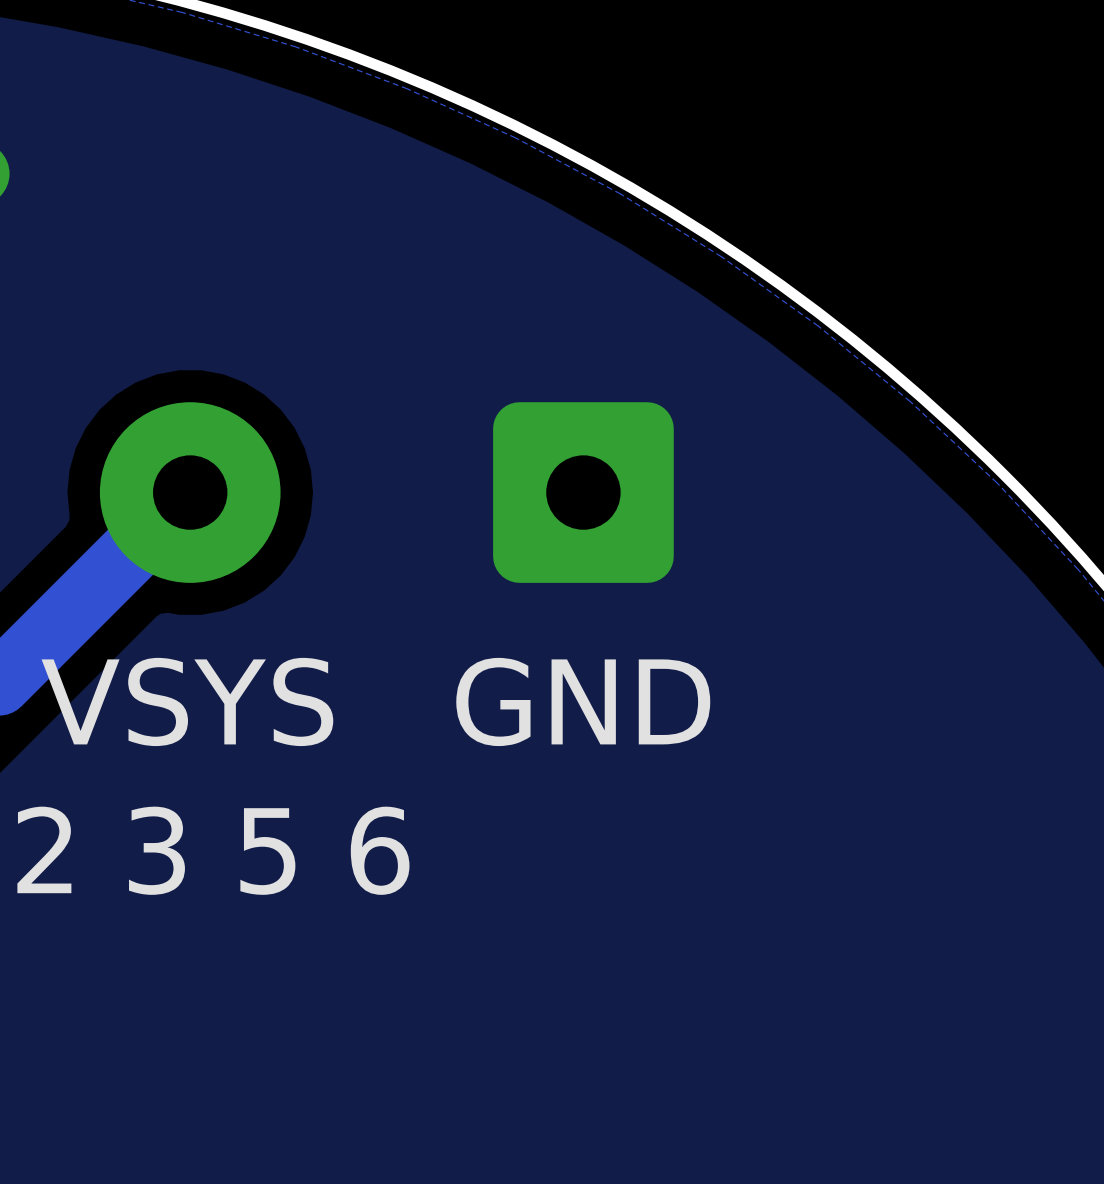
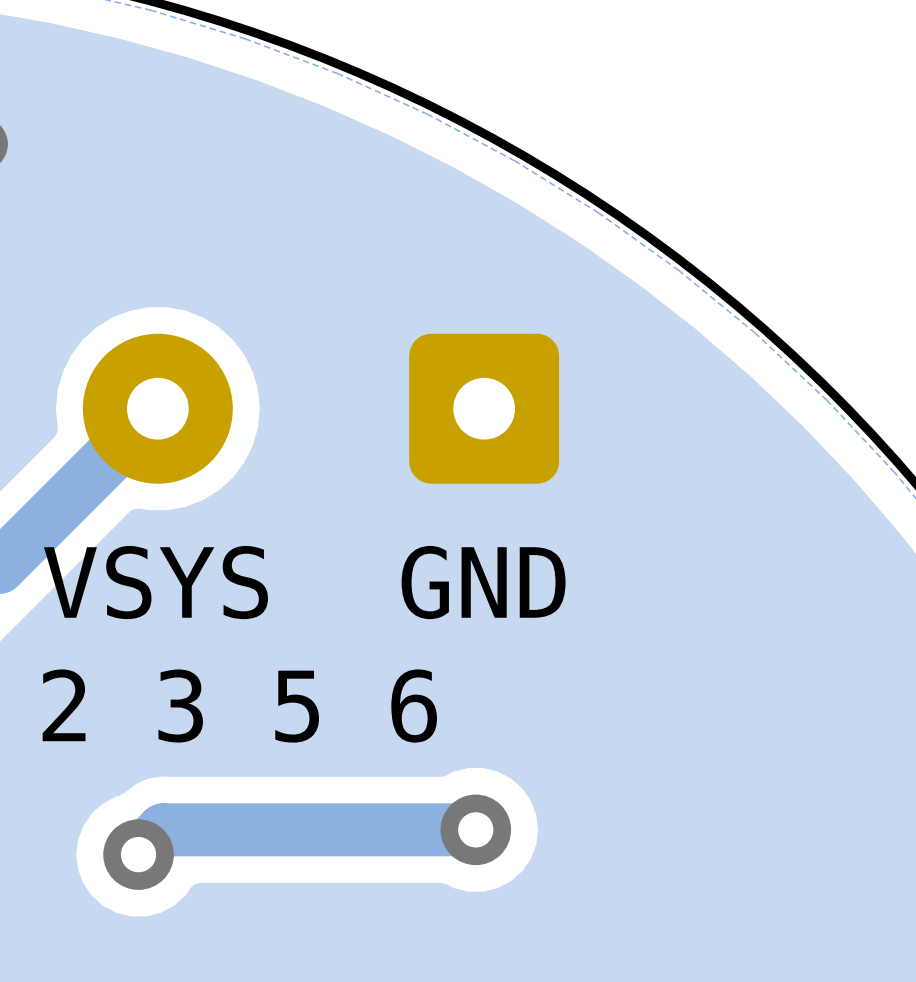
track: none -> (475, 829) (163, 829) (138, 854)
via: none -> (475, 829)
via: none -> (138, 854)

